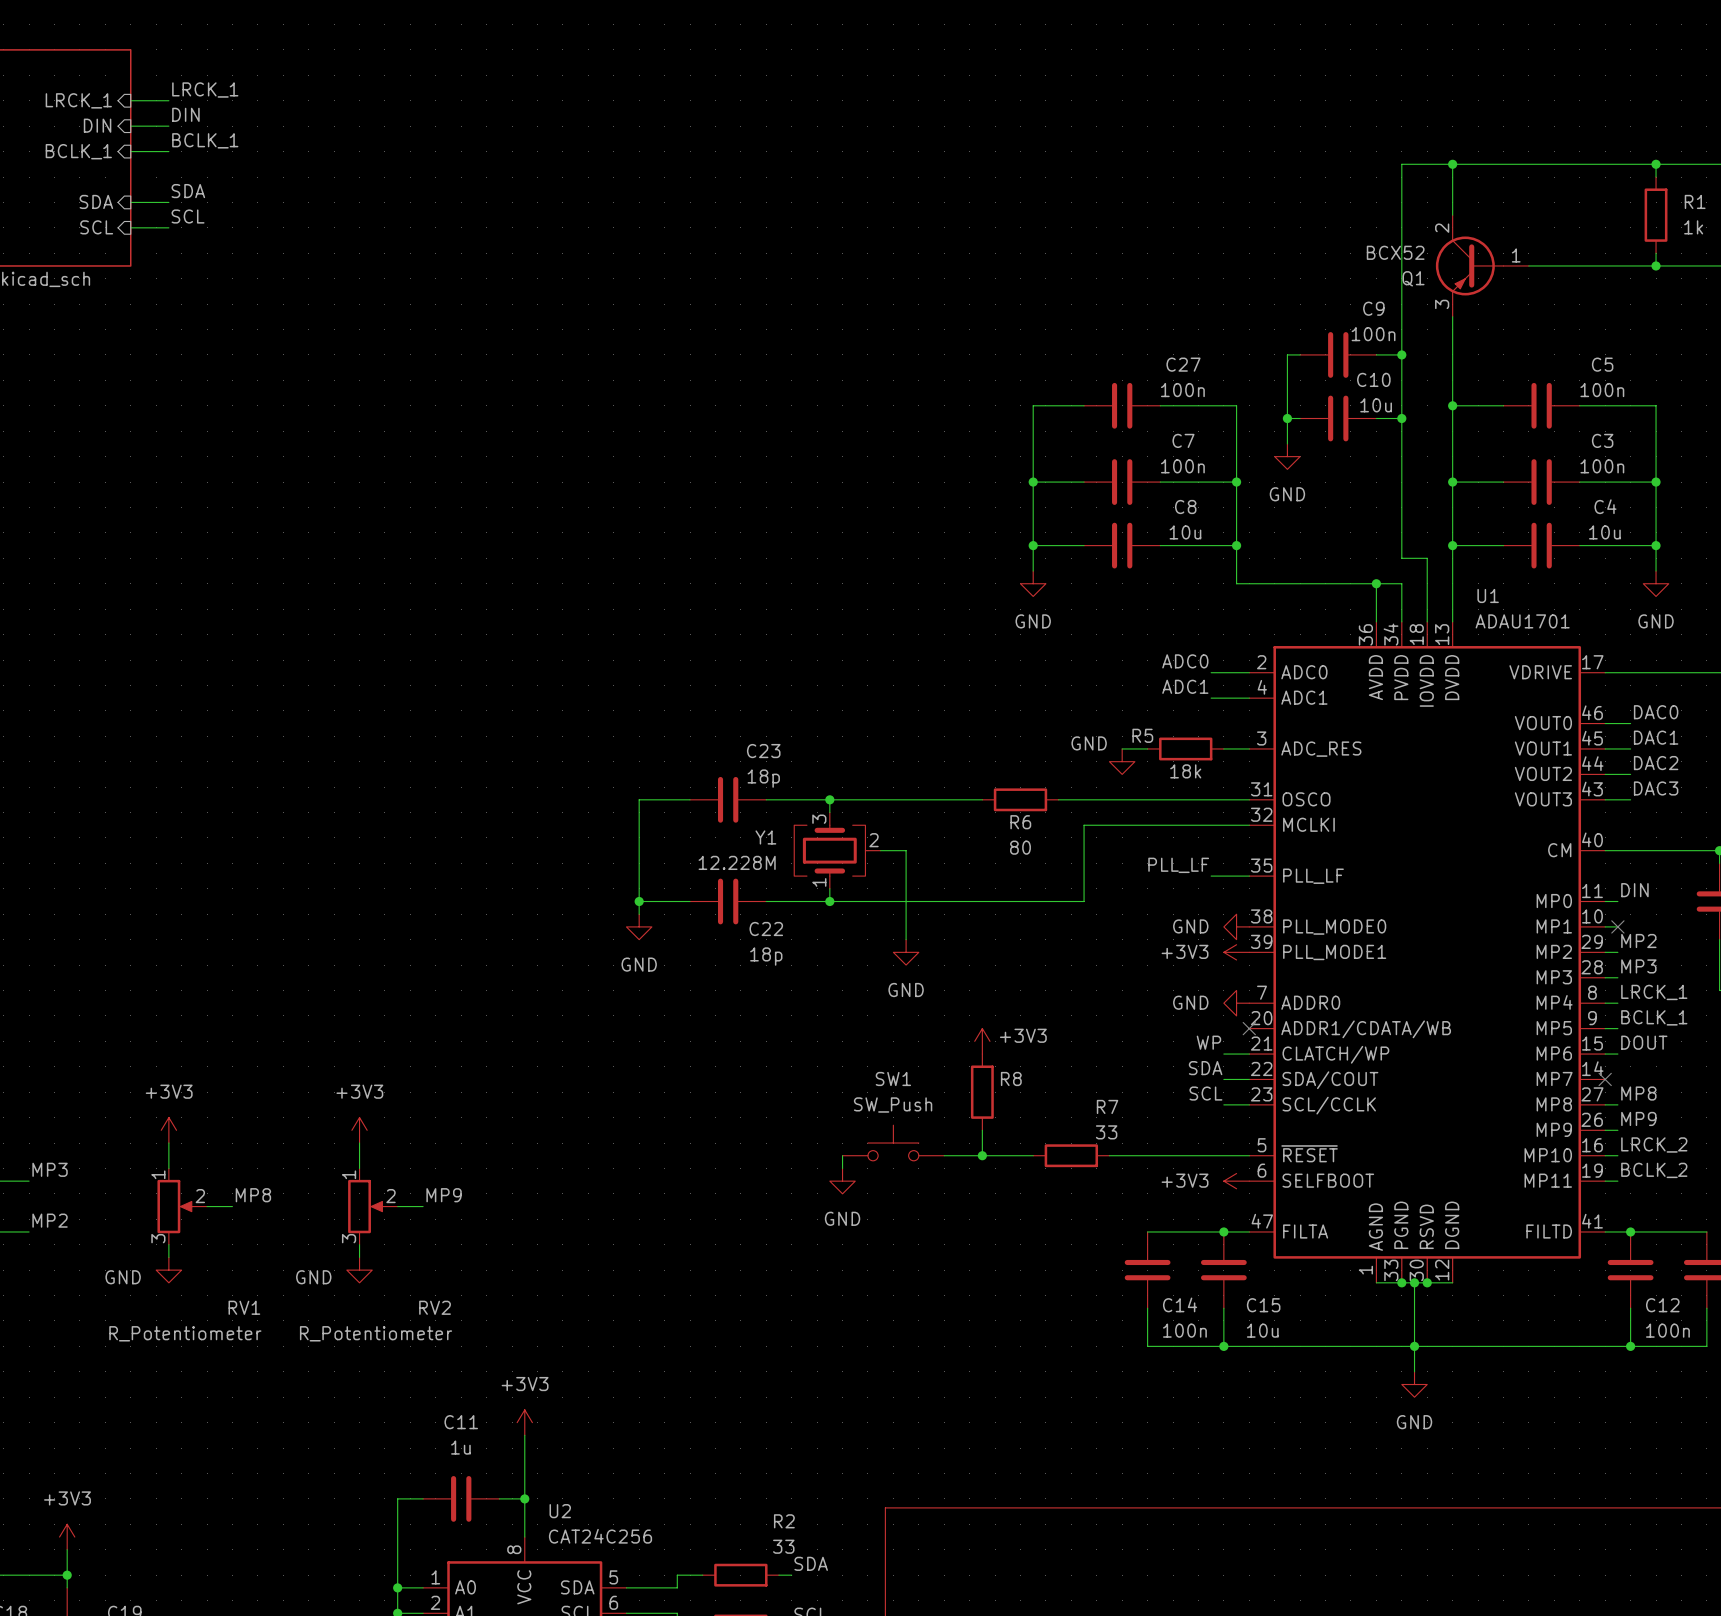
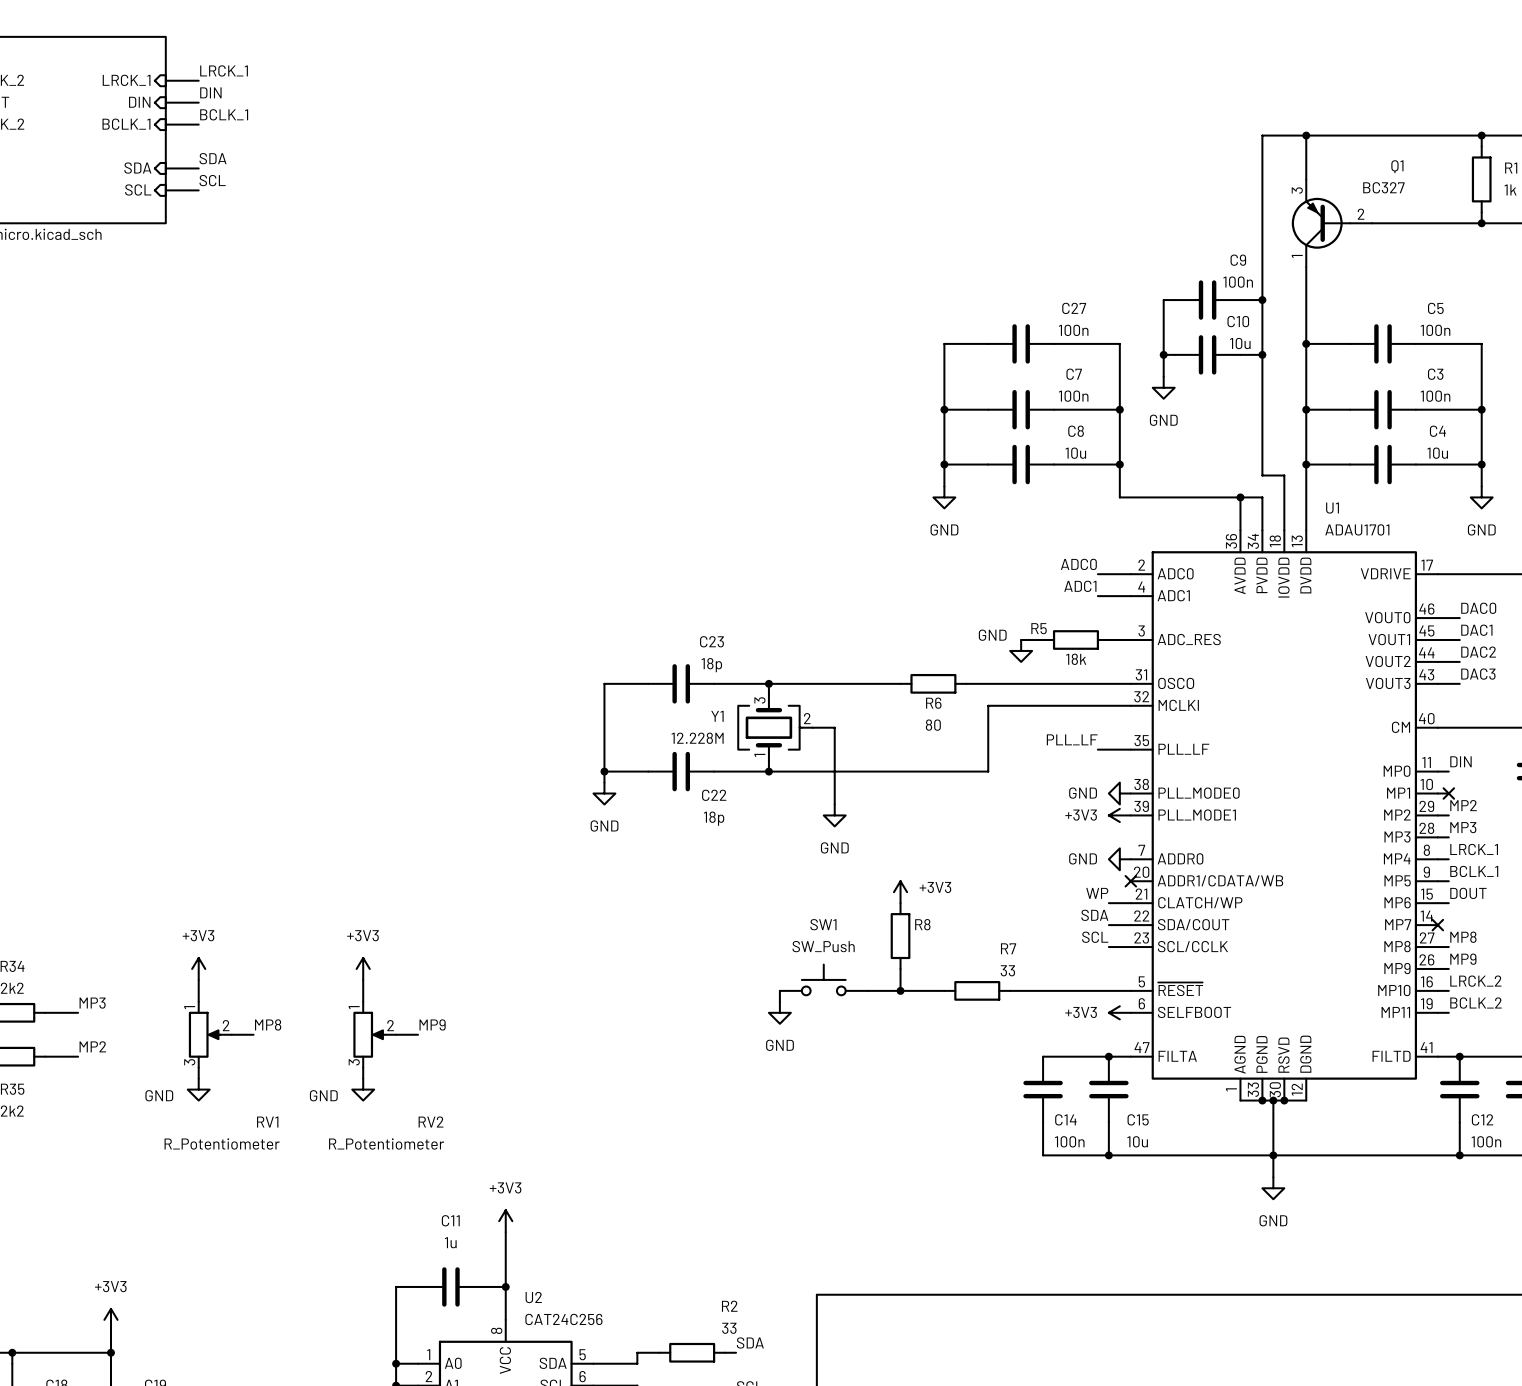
Q1 symbol: [1435, 215, 1529, 317] -> [1291, 179, 1373, 268]
Q1 value: BCX52 (1395, 252) -> BC327 (1383, 187)
Q1 name position: Q1 (1413, 278) -> Q1 (1397, 166)

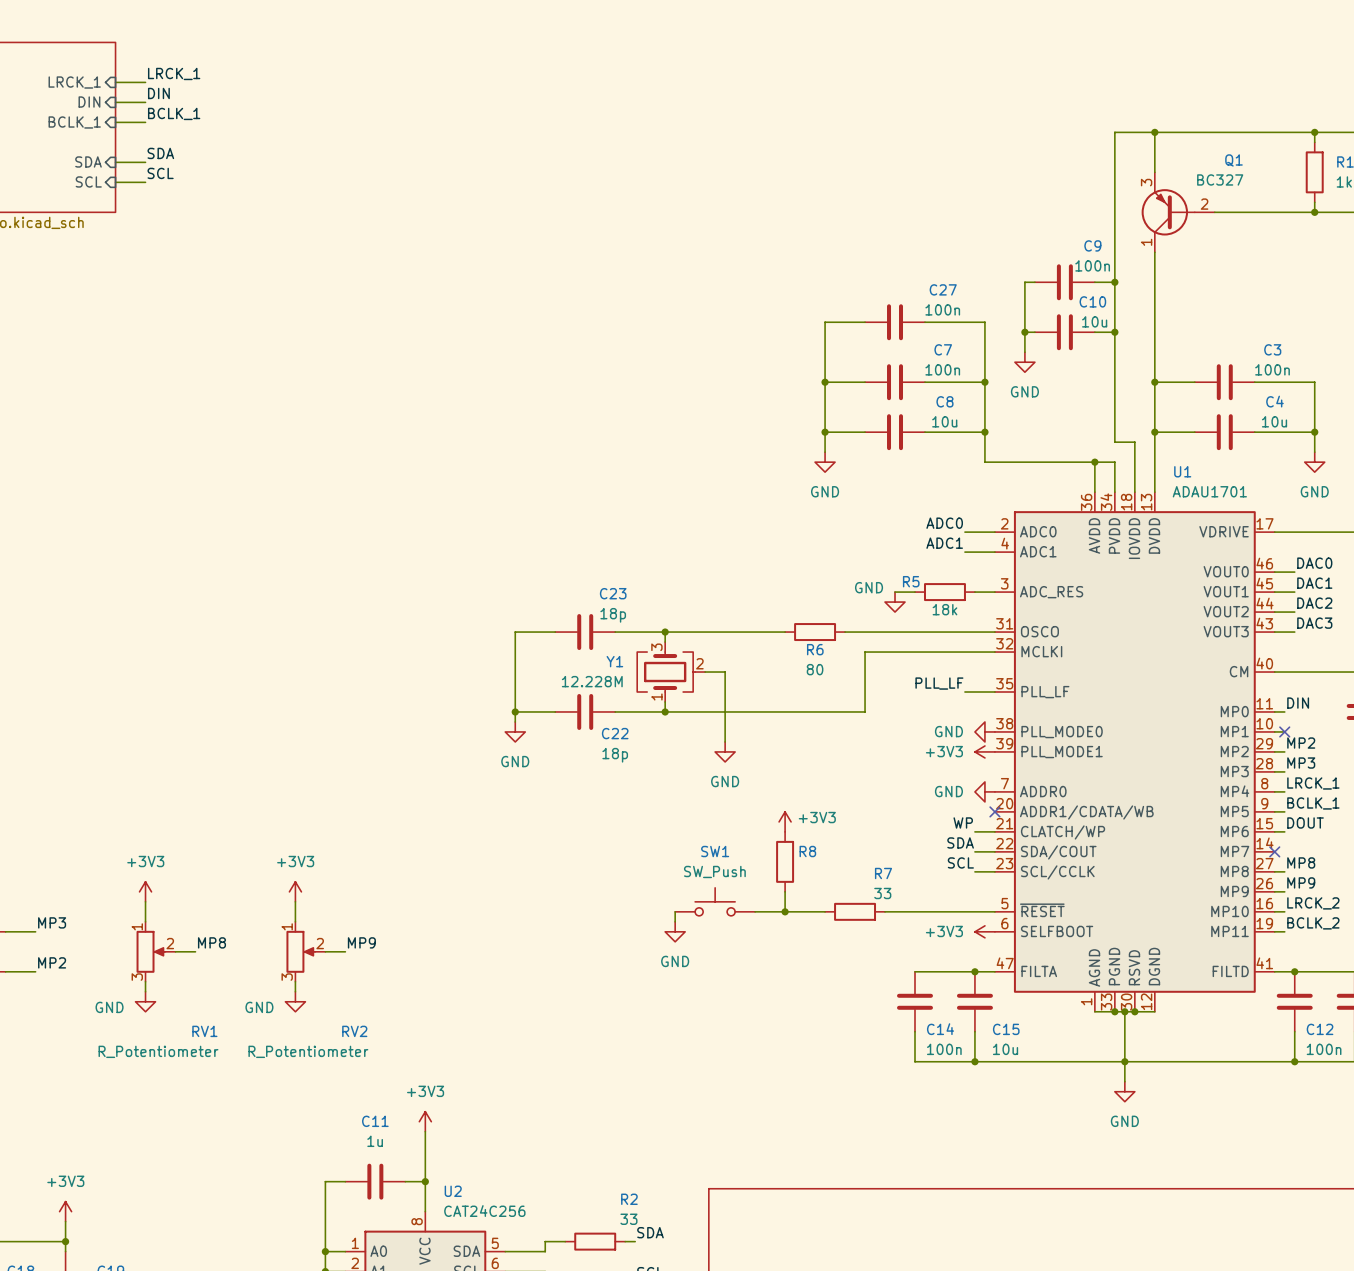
wire: (1306, 343) (1350, 343) -> none
junction: (1306, 343) -> none
C5: 100n (1383, 343) -> none
wire: (1415, 343) (1481, 343) (1481, 409) -> none
junction: (1481, 409) -> none

